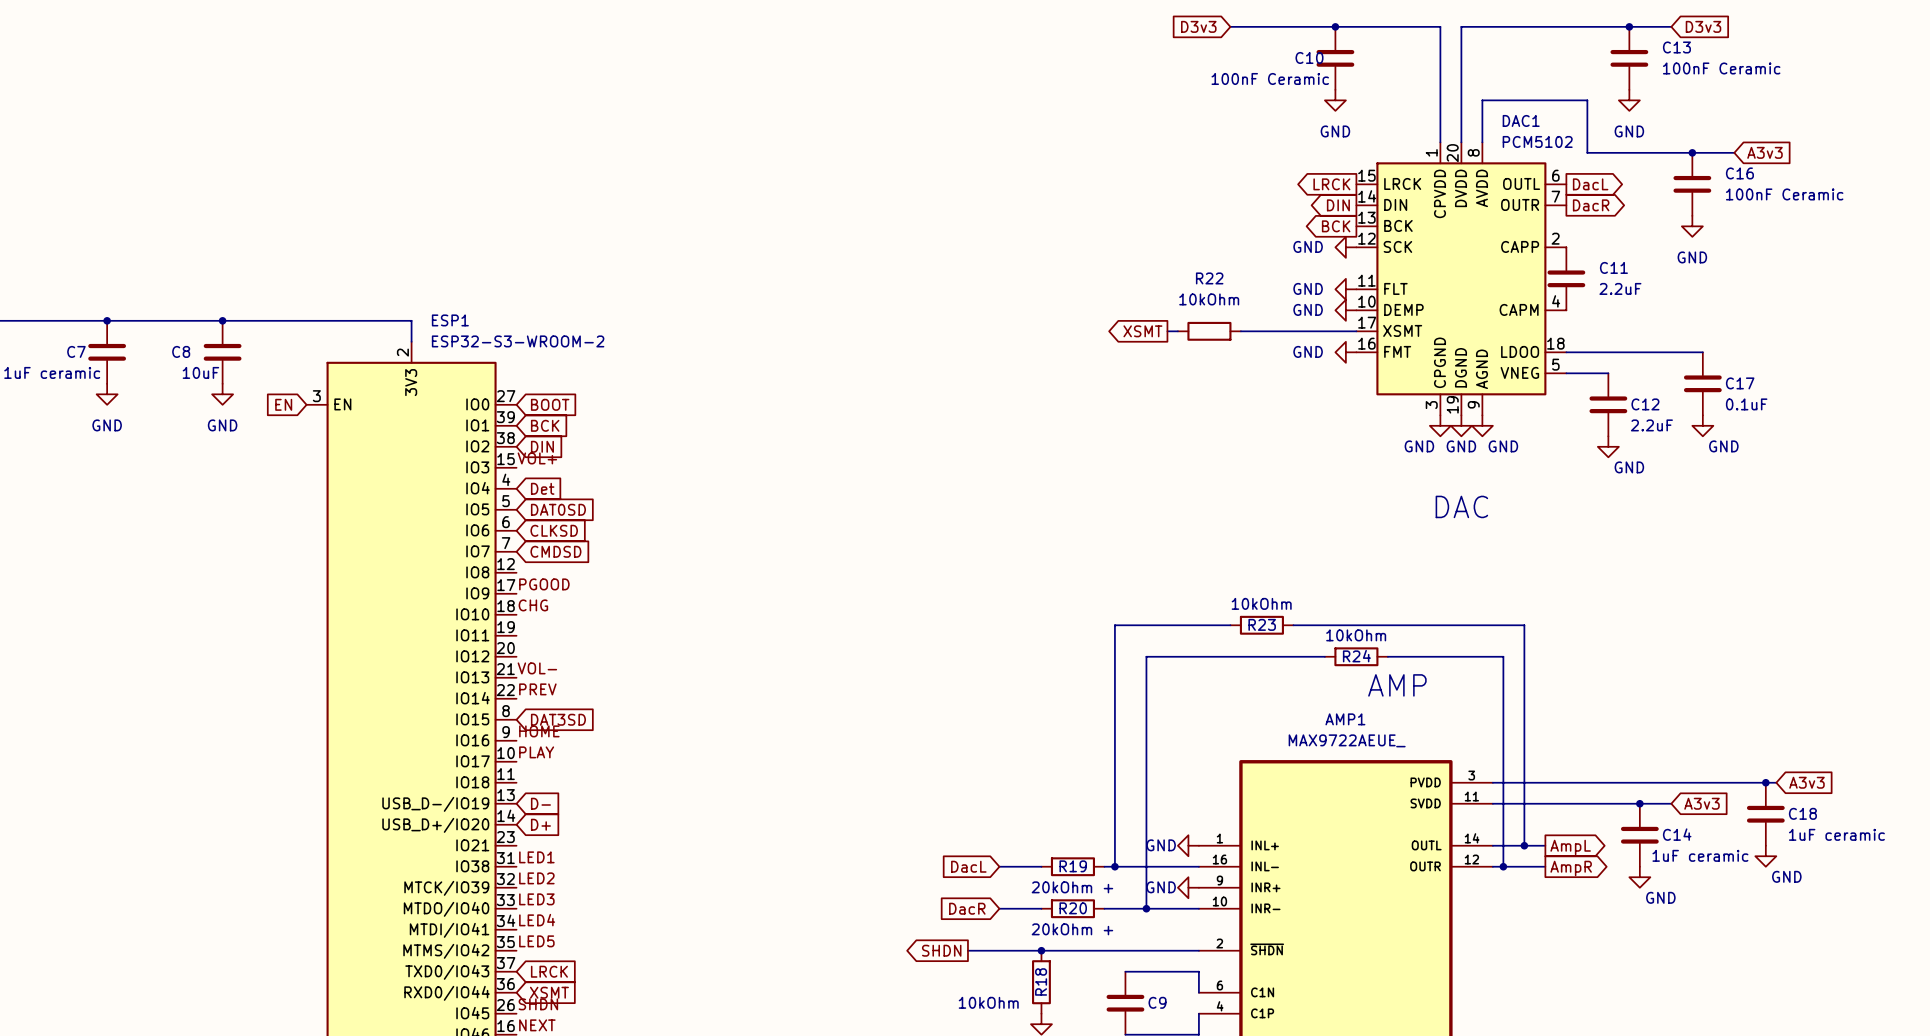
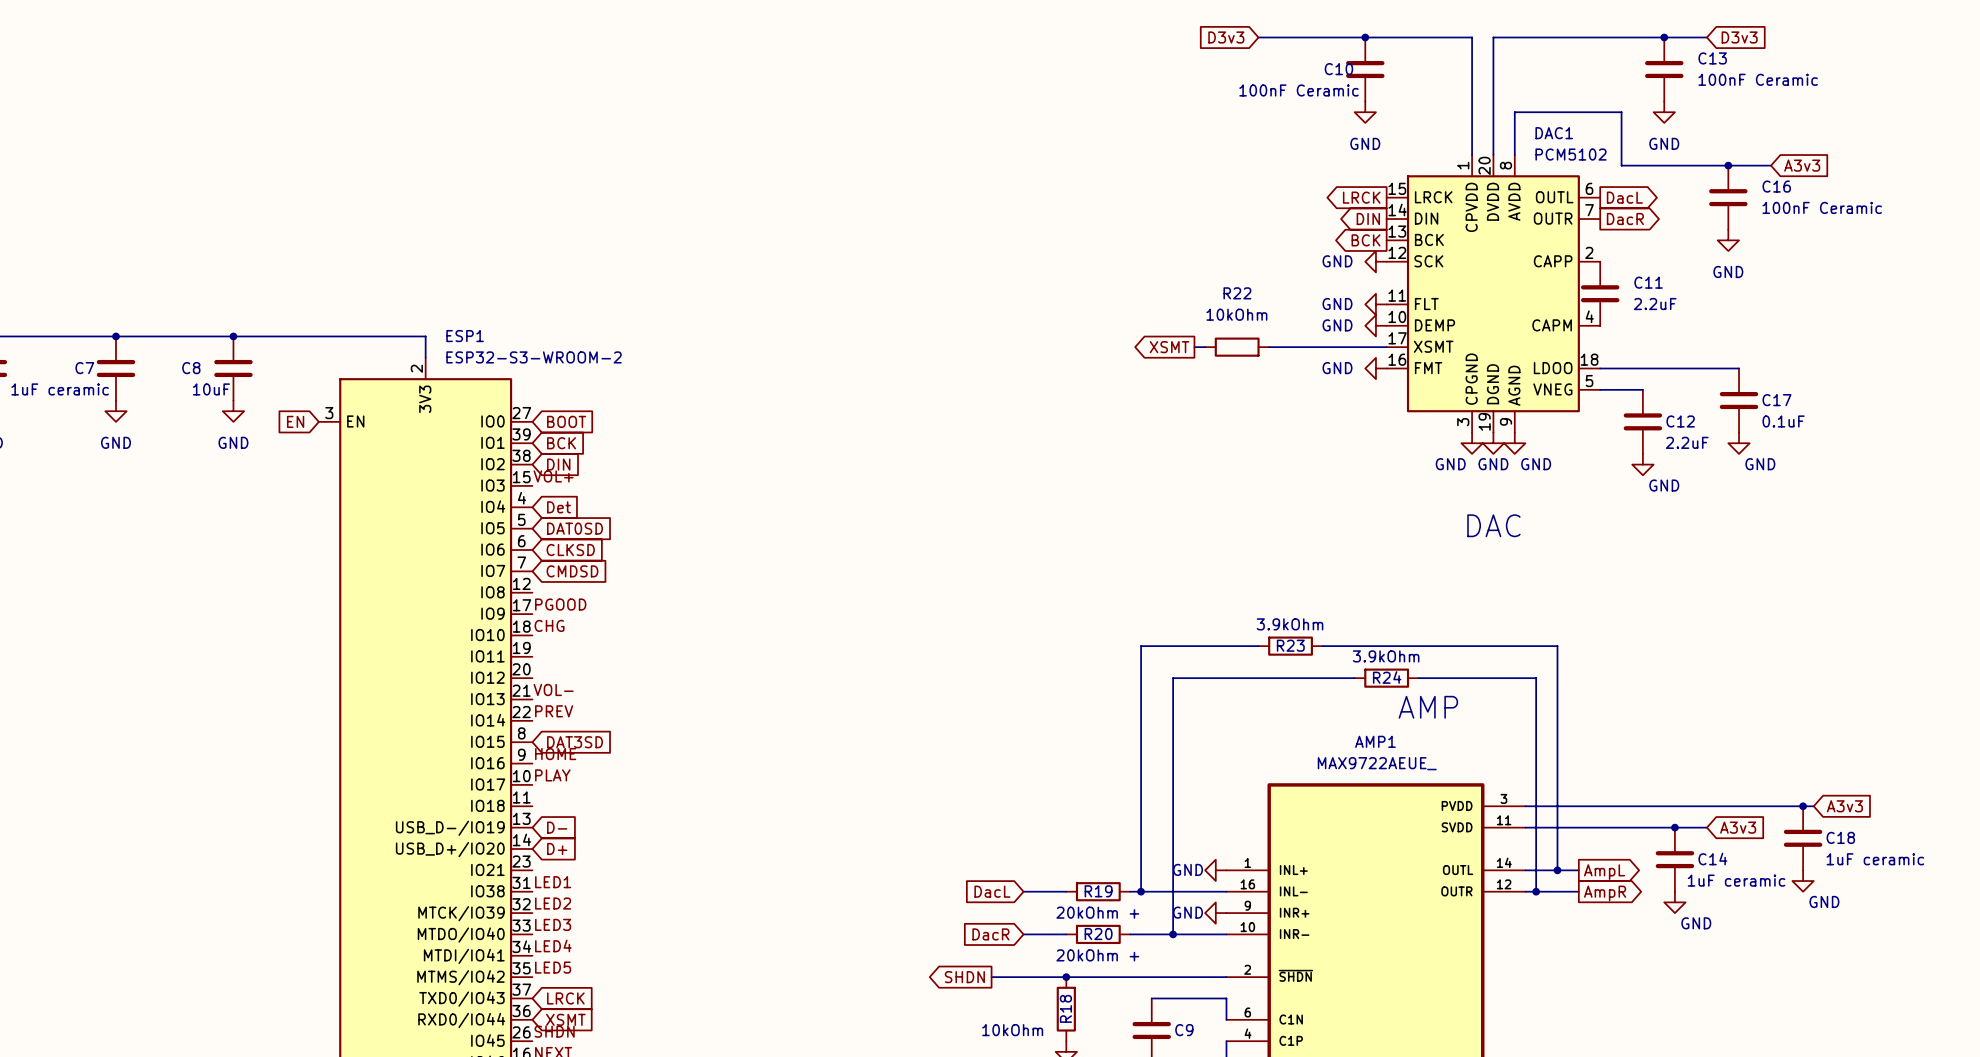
R23 value: 10kOhm (1261, 603) -> 3.9kOhm (1290, 624)
R24 value: 10kOhm (1356, 635) -> 3.9kOhm (1386, 656)

